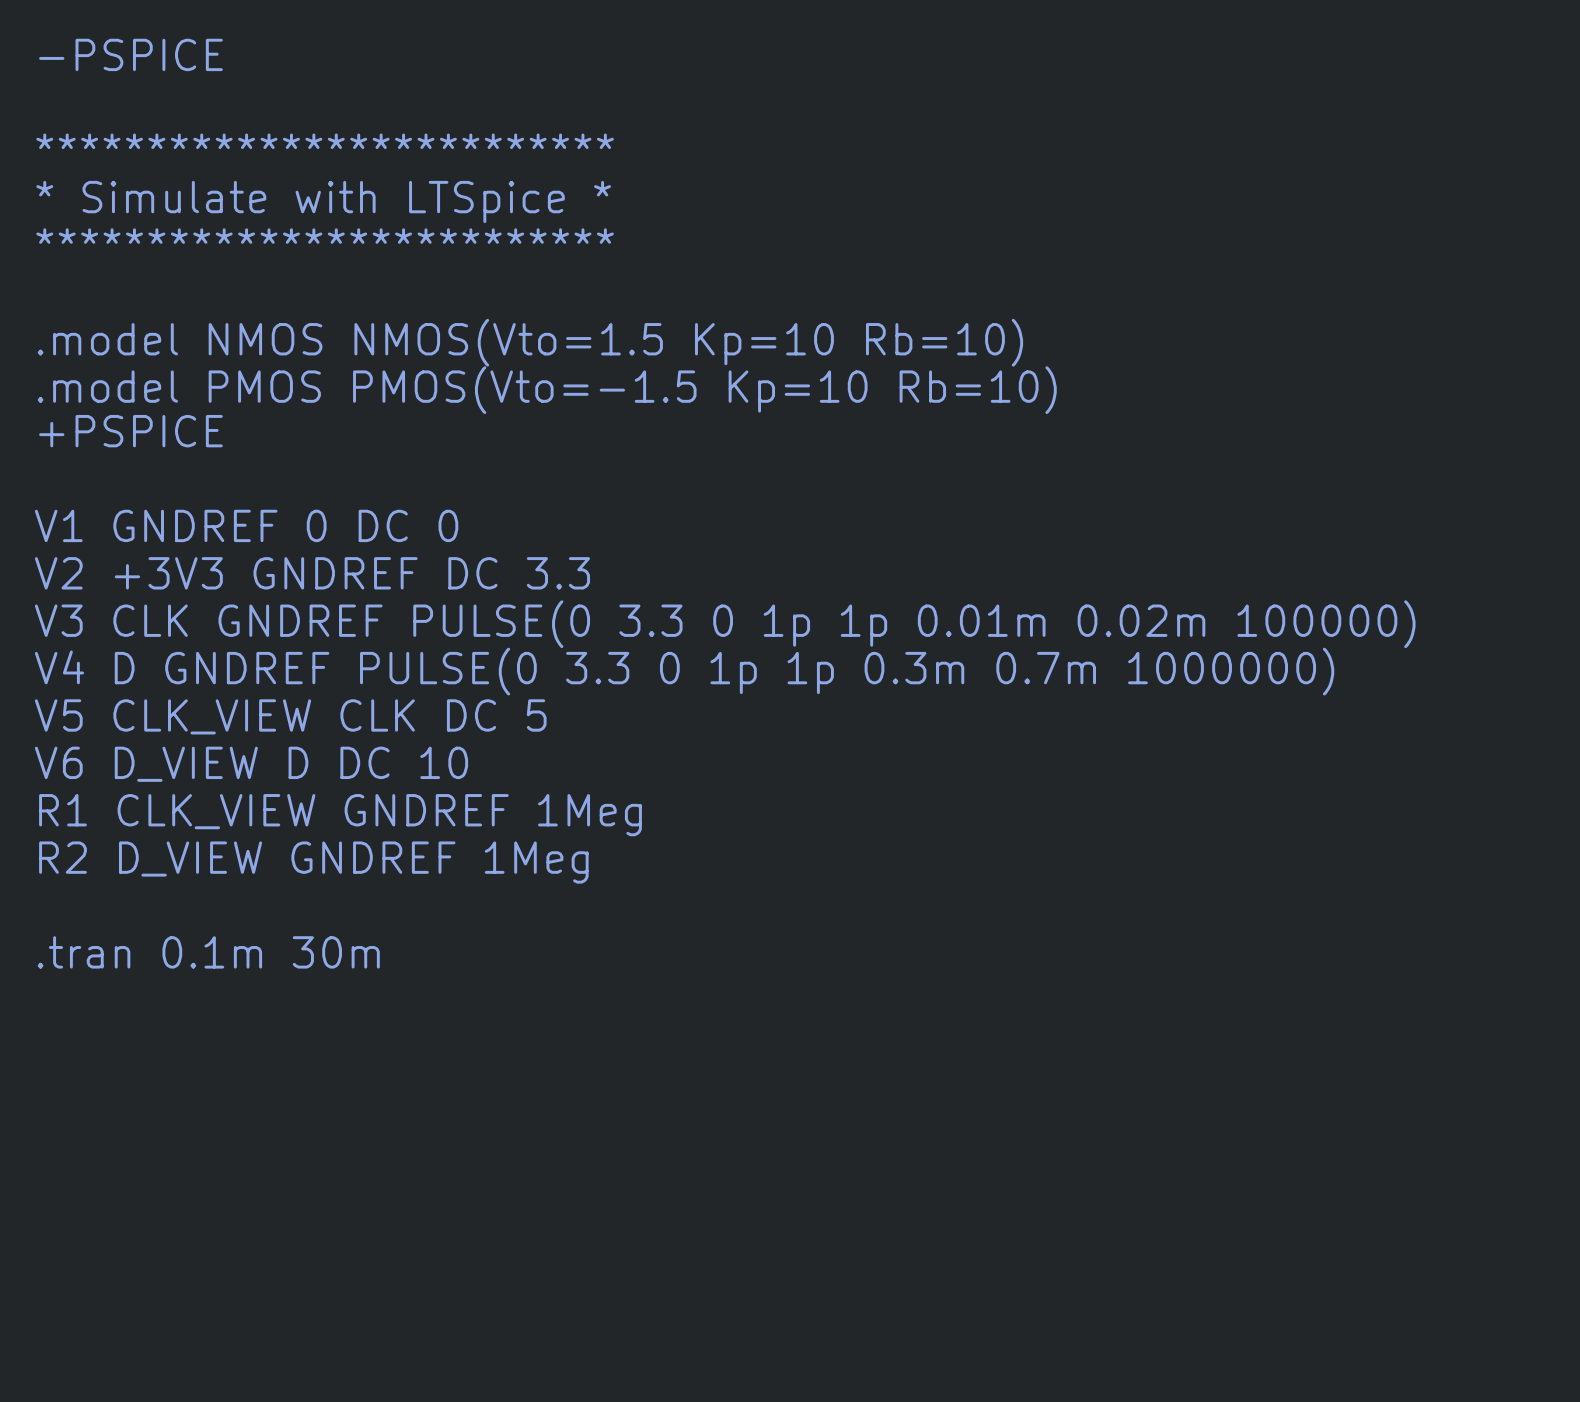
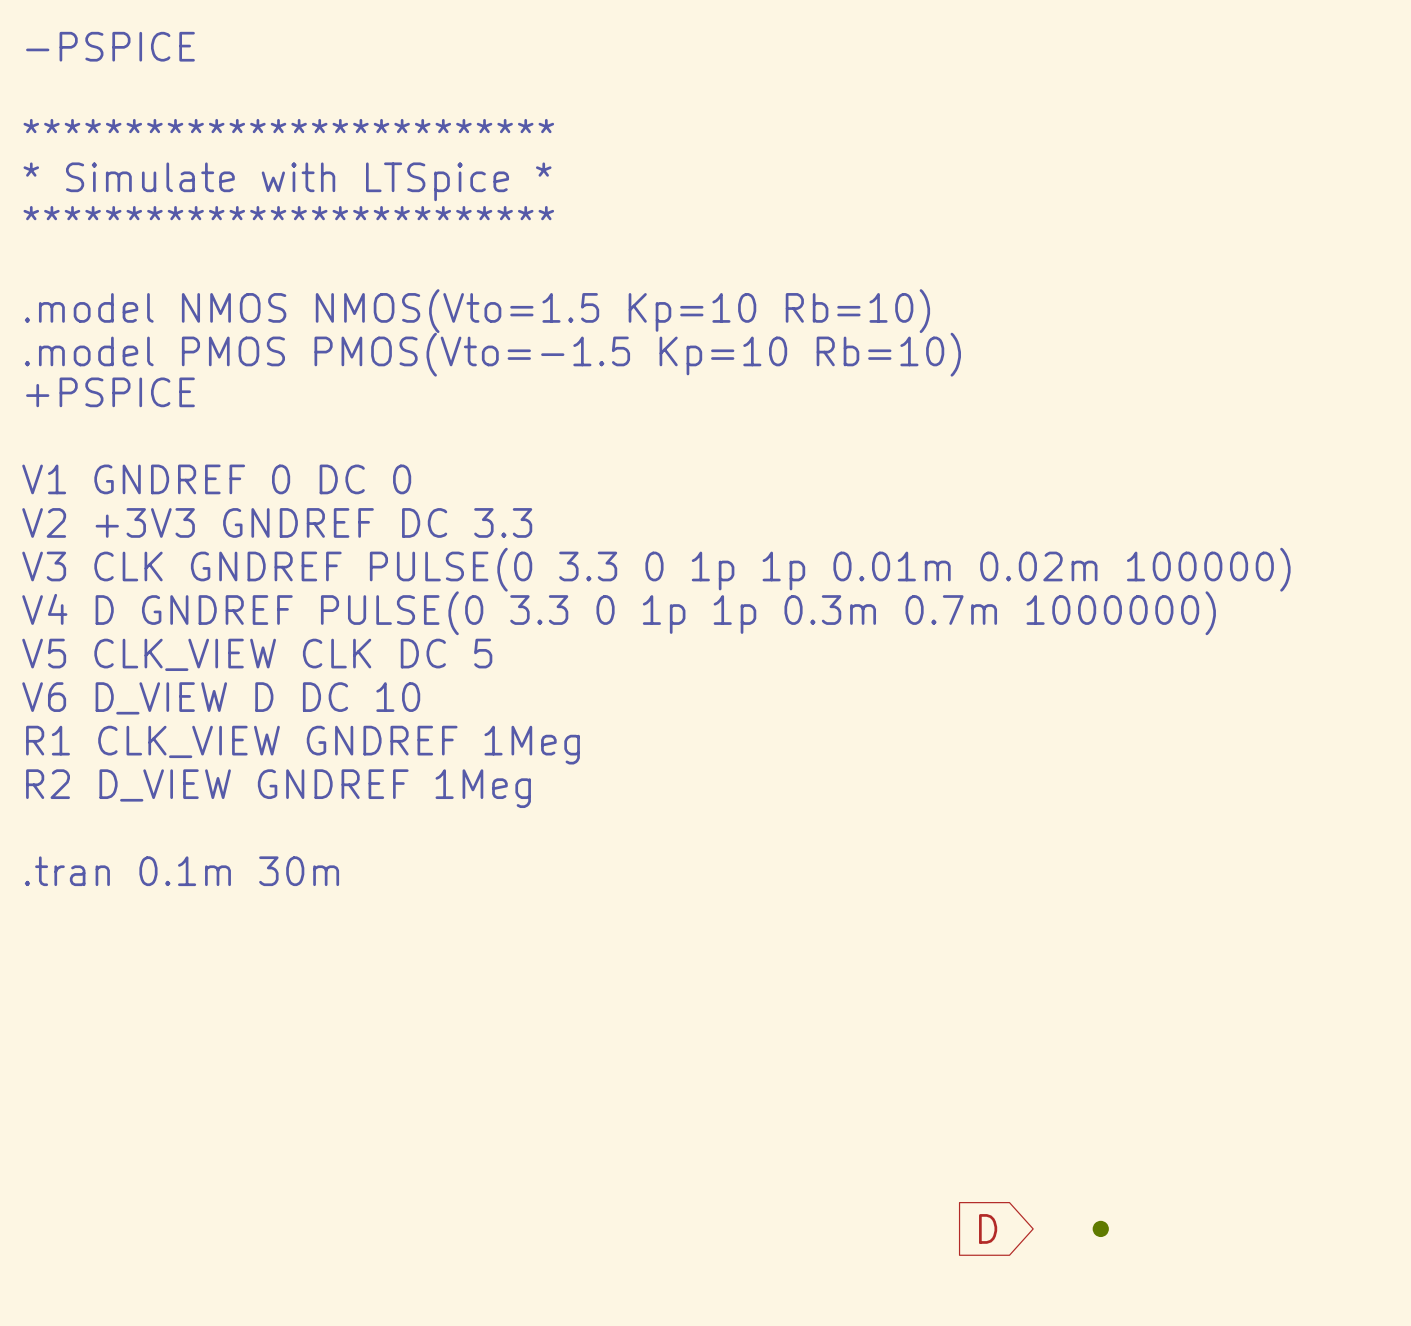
global label: none -> D (988, 1228)
junction: none -> (1100, 1228)

